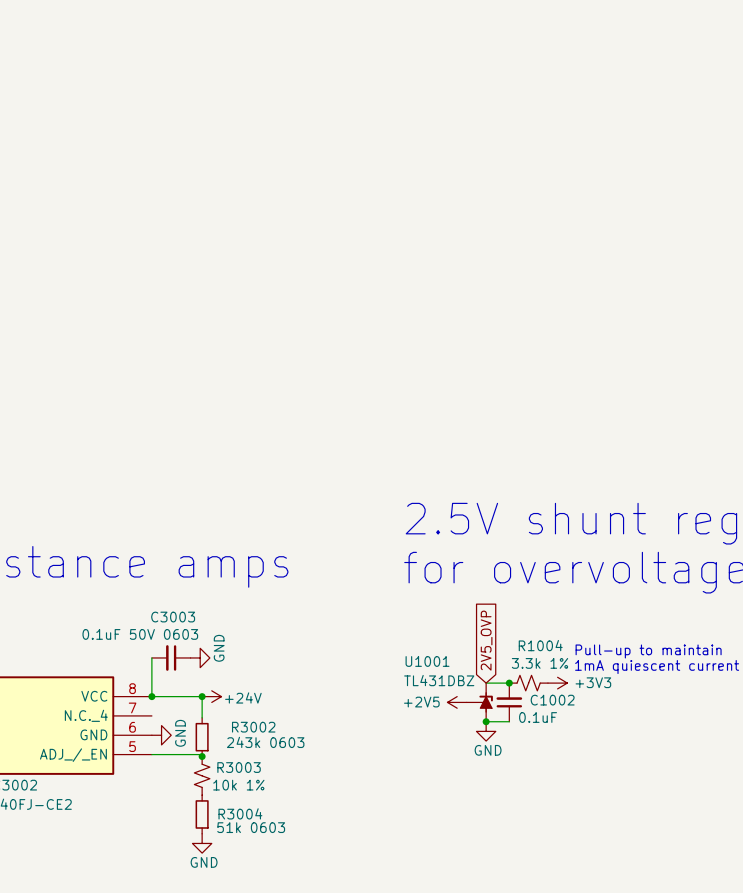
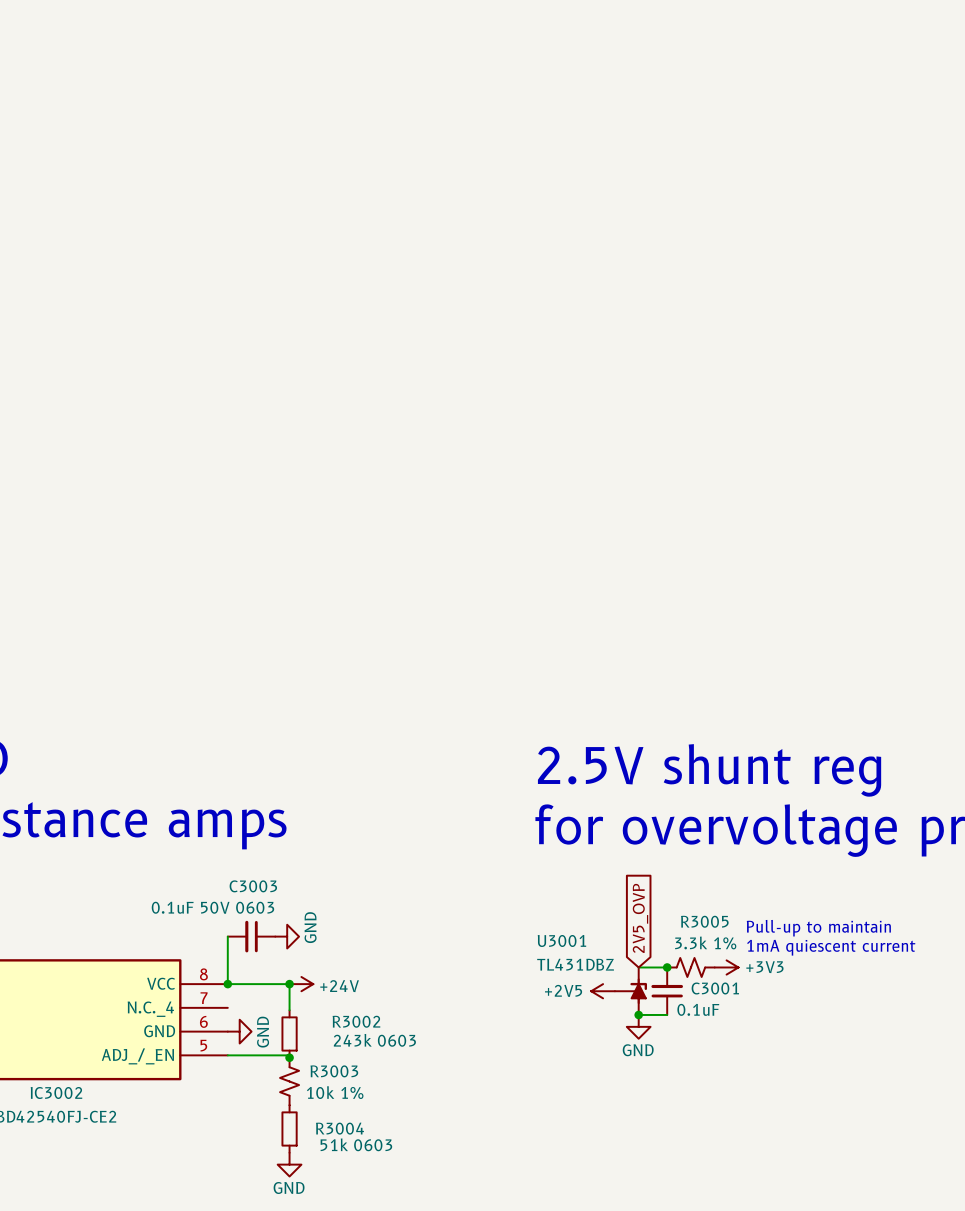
R1004 name: R1004 (540, 645) -> R3005 (704, 921)
U1001 name: U1001 (427, 661) -> U3001 (561, 940)
C1002 name: C1002 (552, 700) -> C3001 (715, 988)

